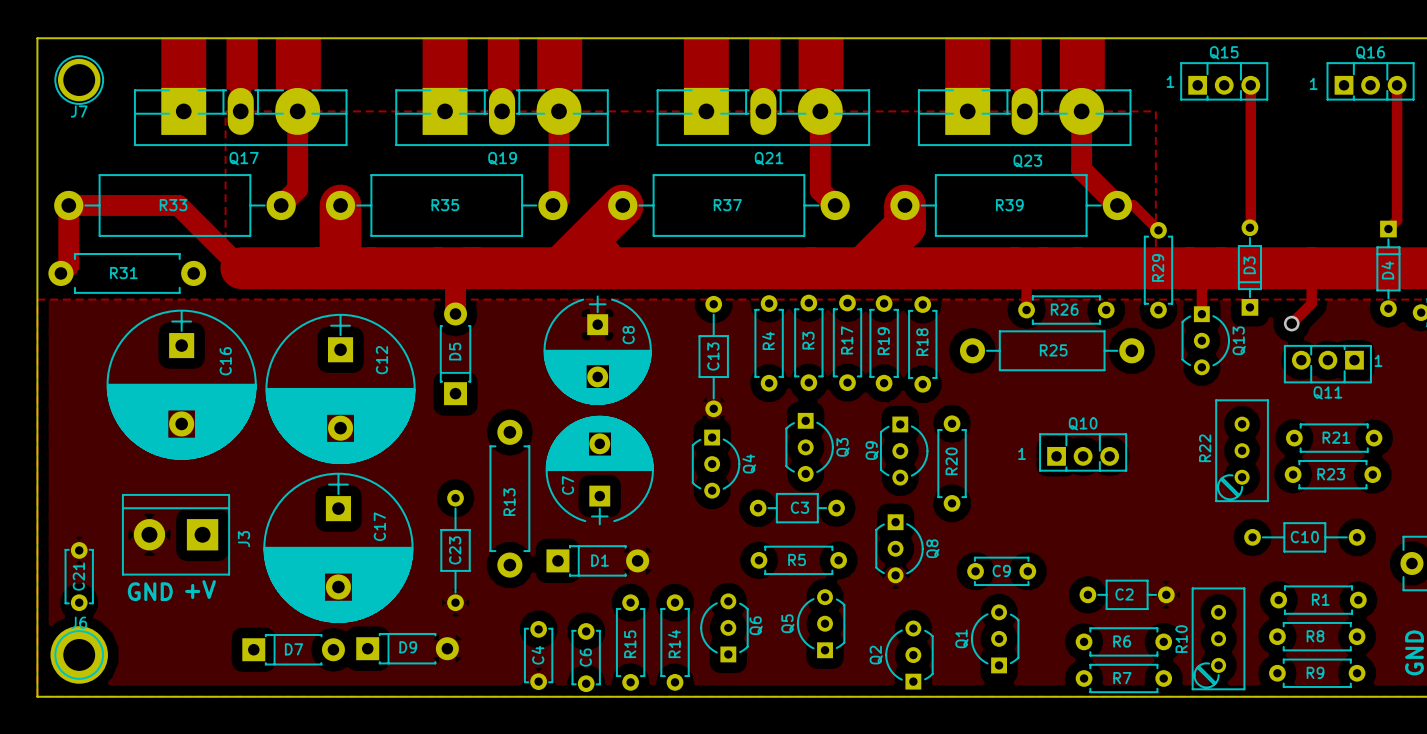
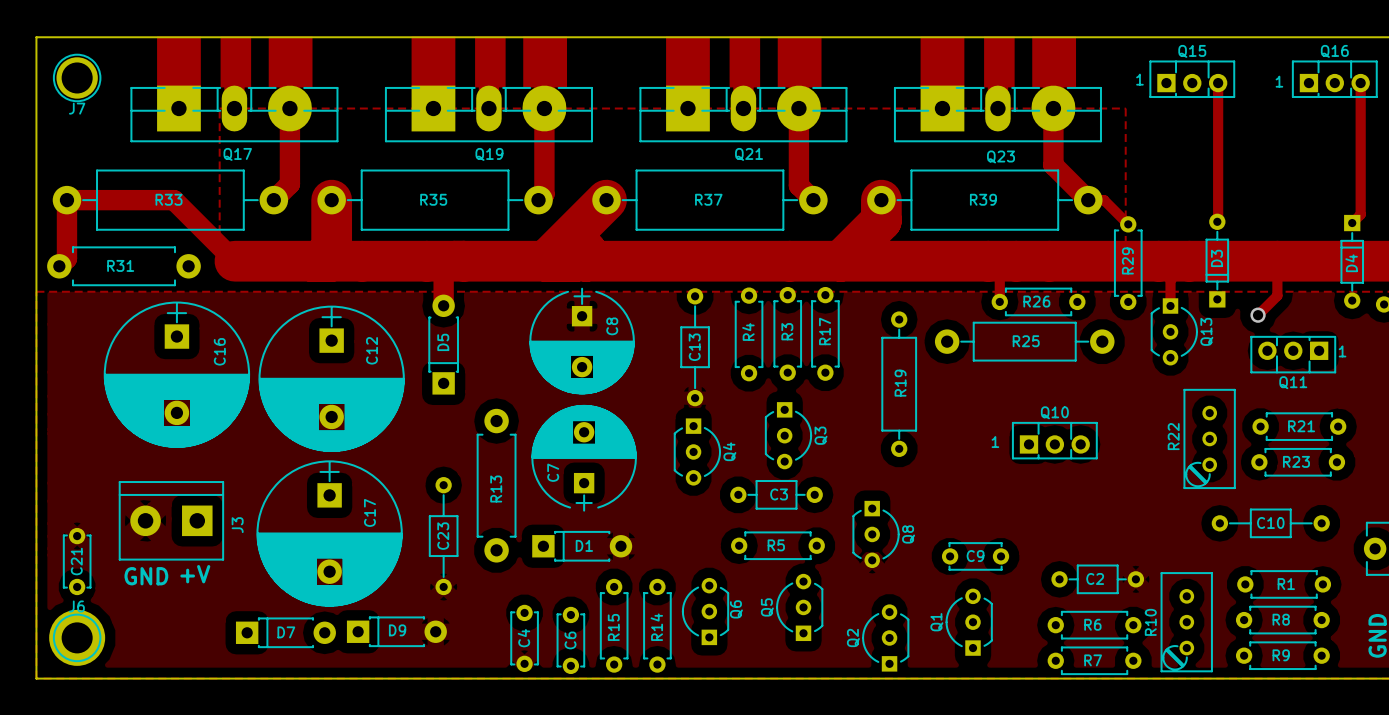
R19 footprint: [869, 295, 899, 392] -> [881, 311, 917, 457]
R18: (922, 344) -> none
Q9: (904, 451) -> none
R20: (952, 463) -> none

